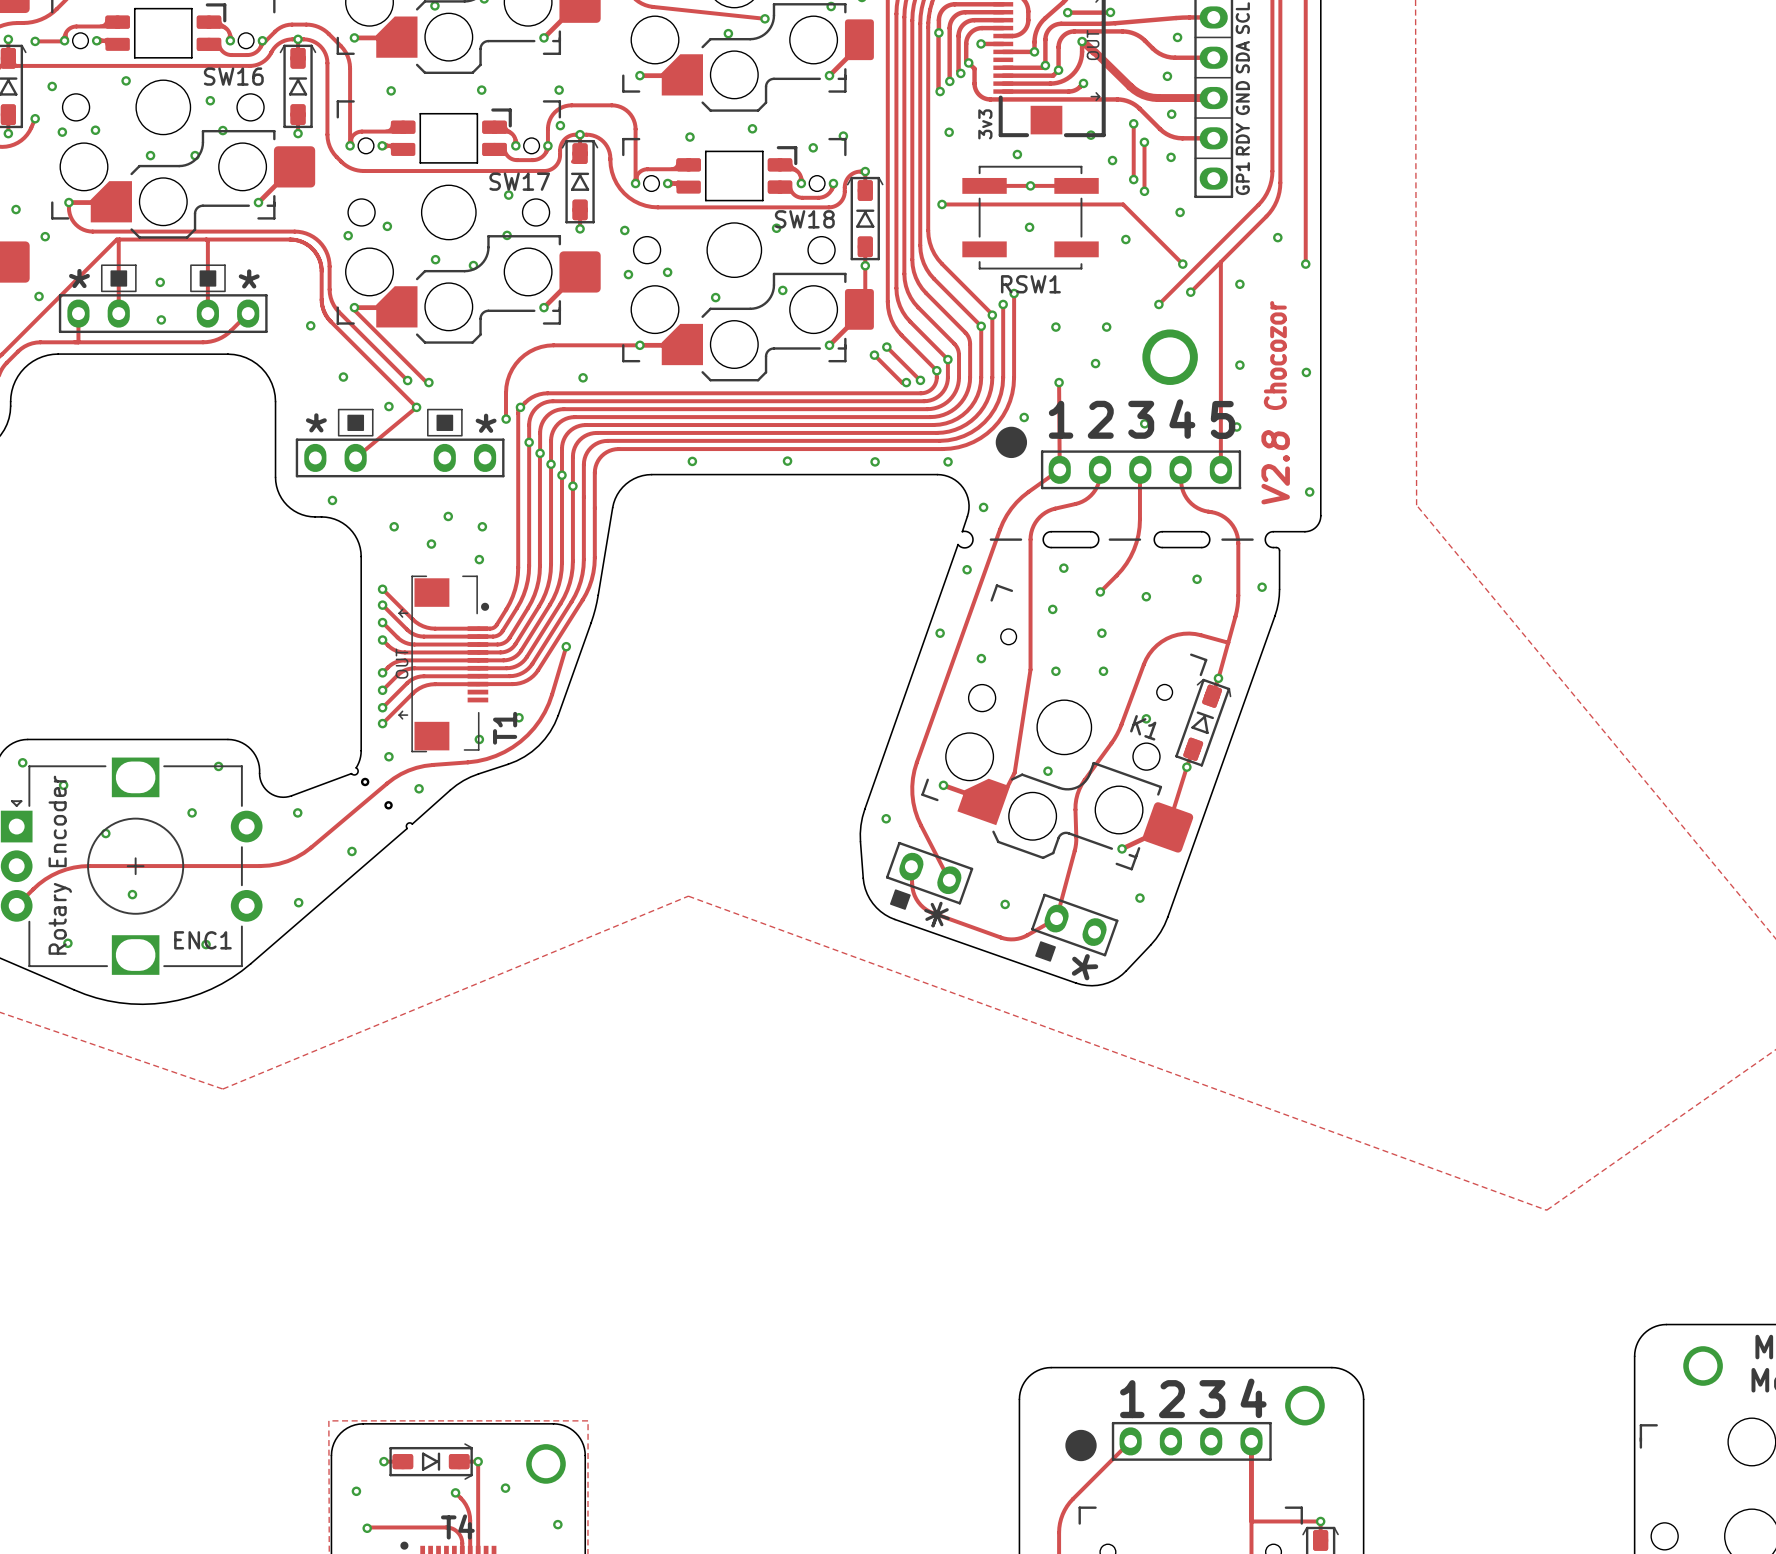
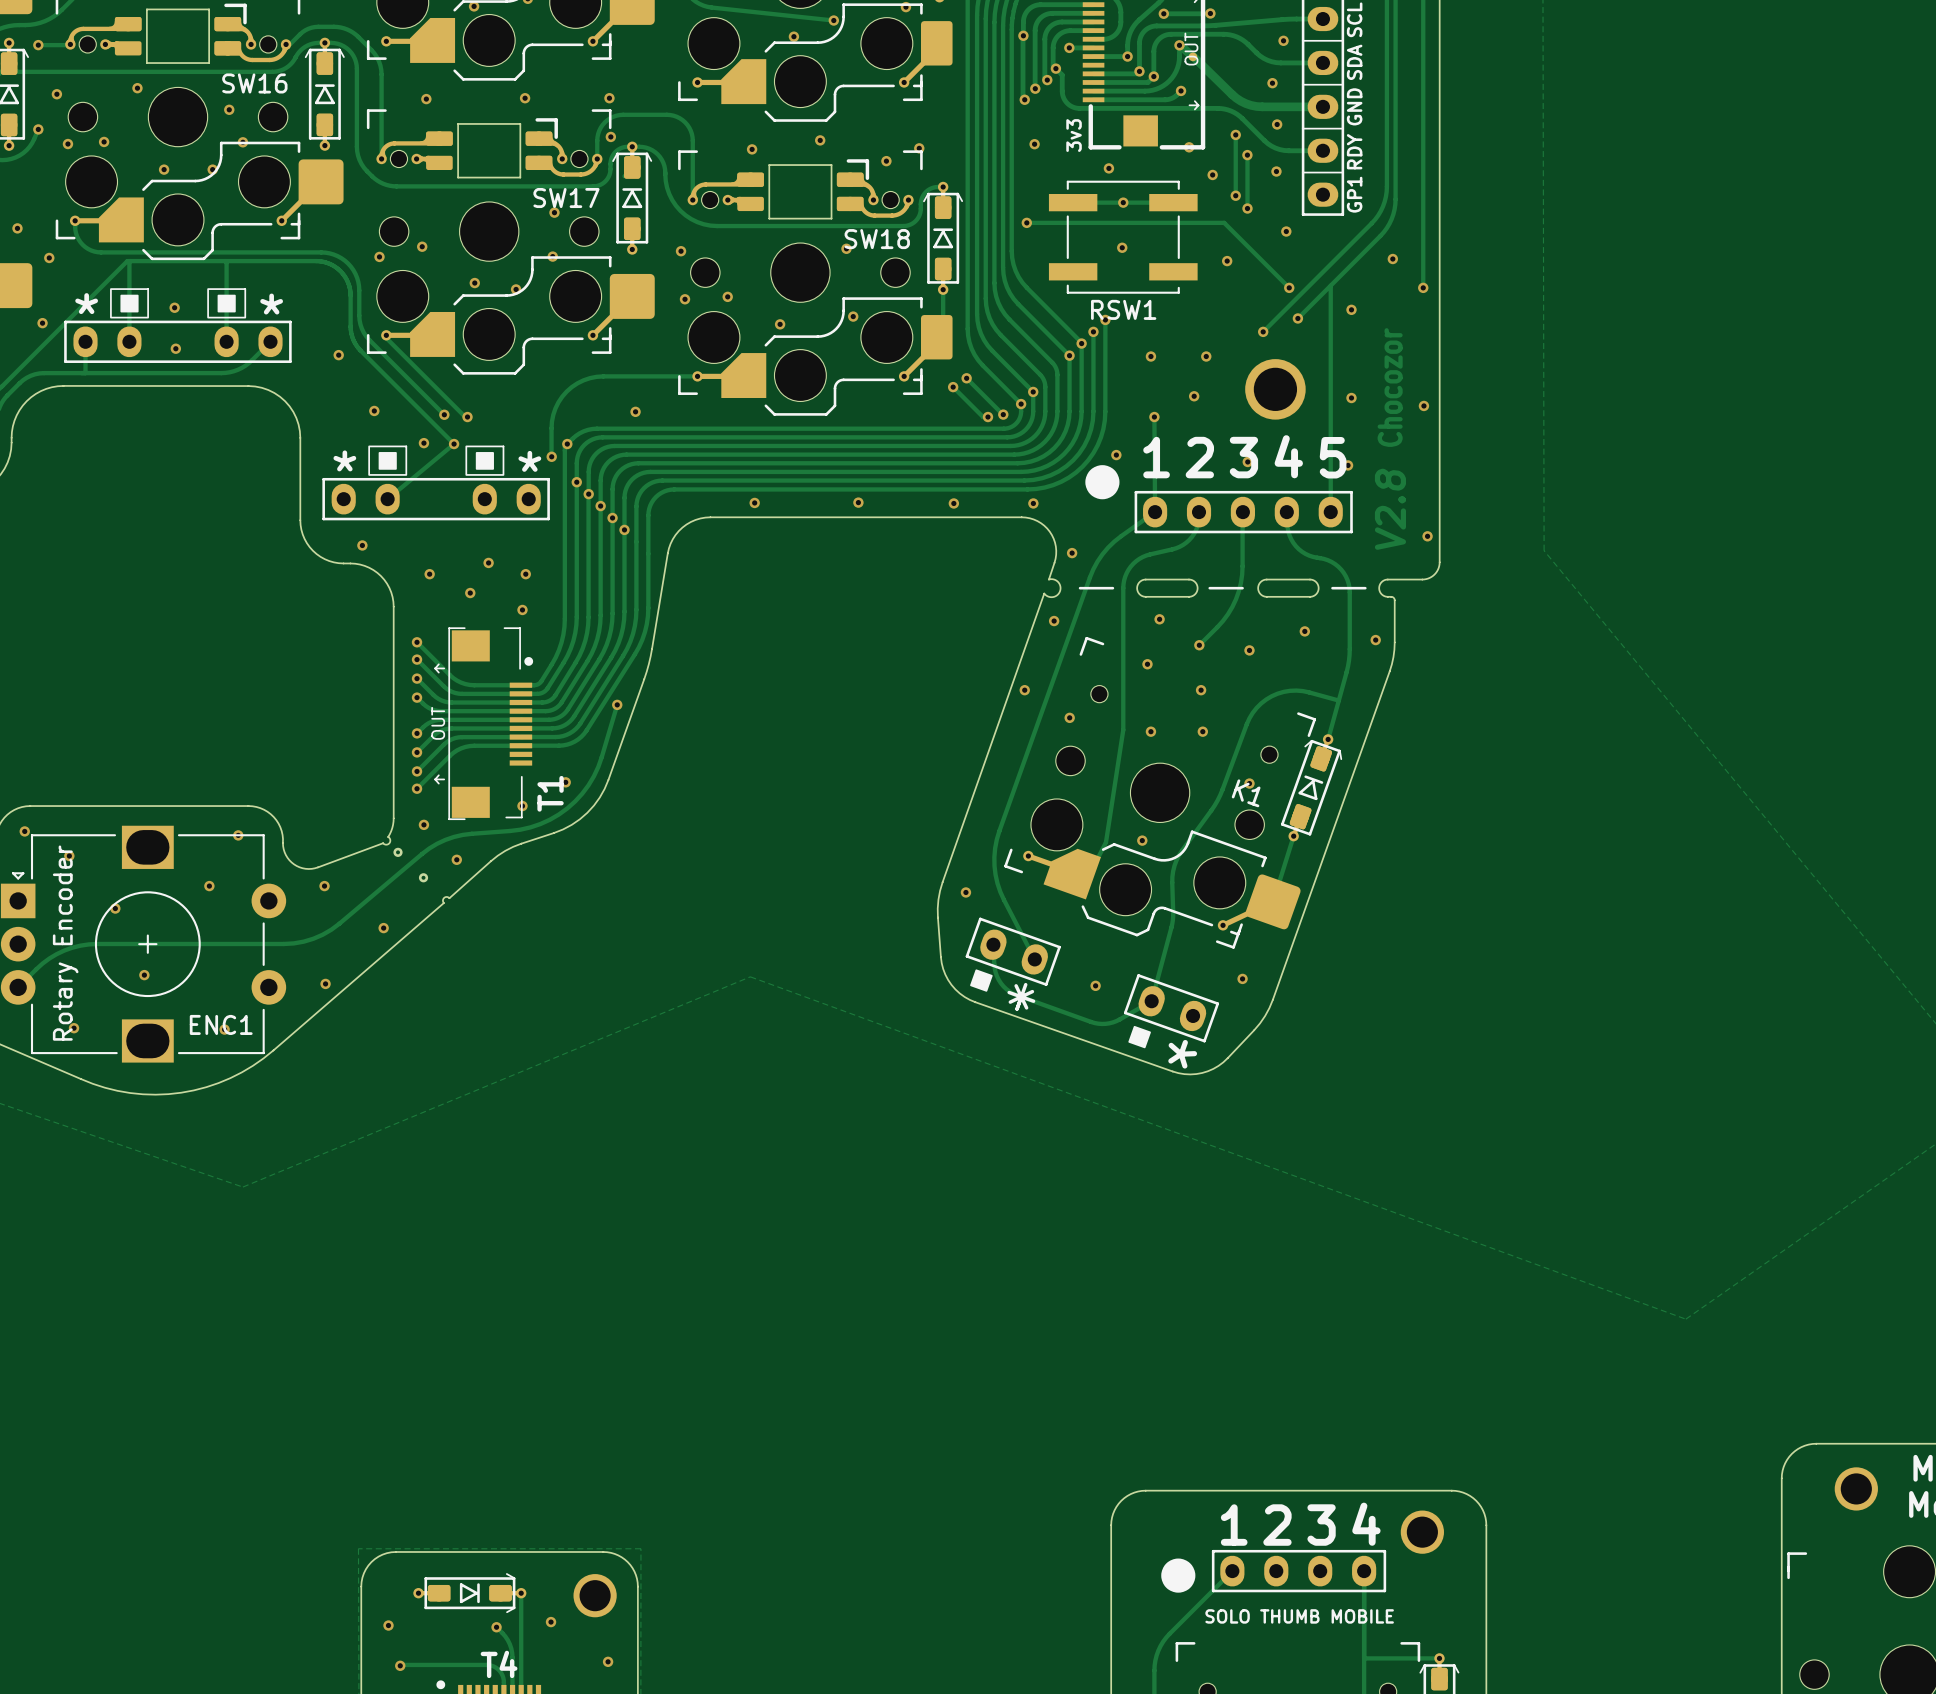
text: none -> SOLO THUMB MOBILE (1299, 1616)

